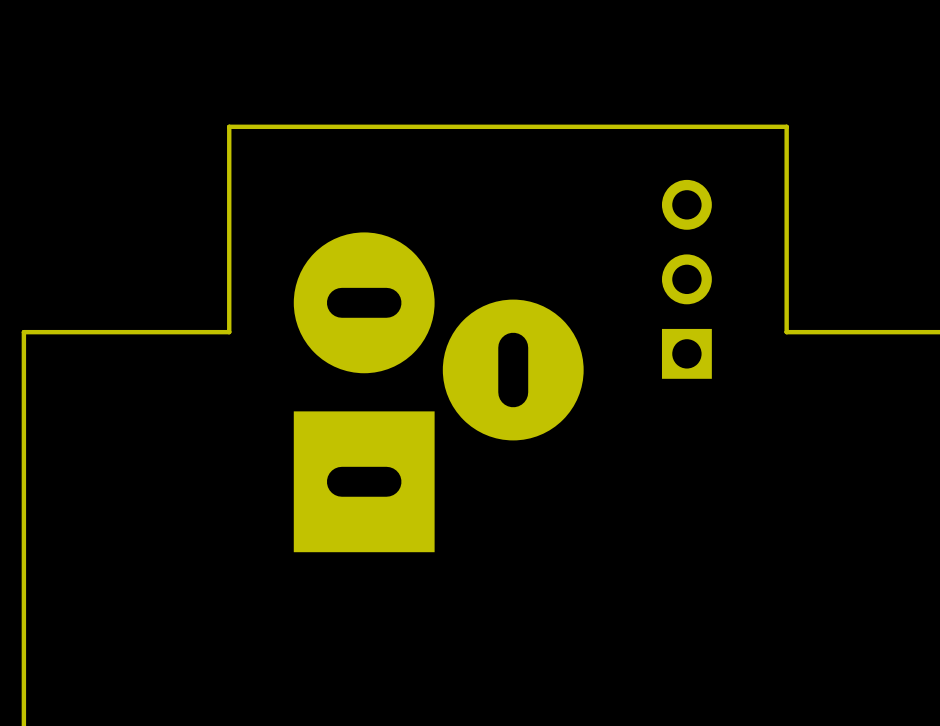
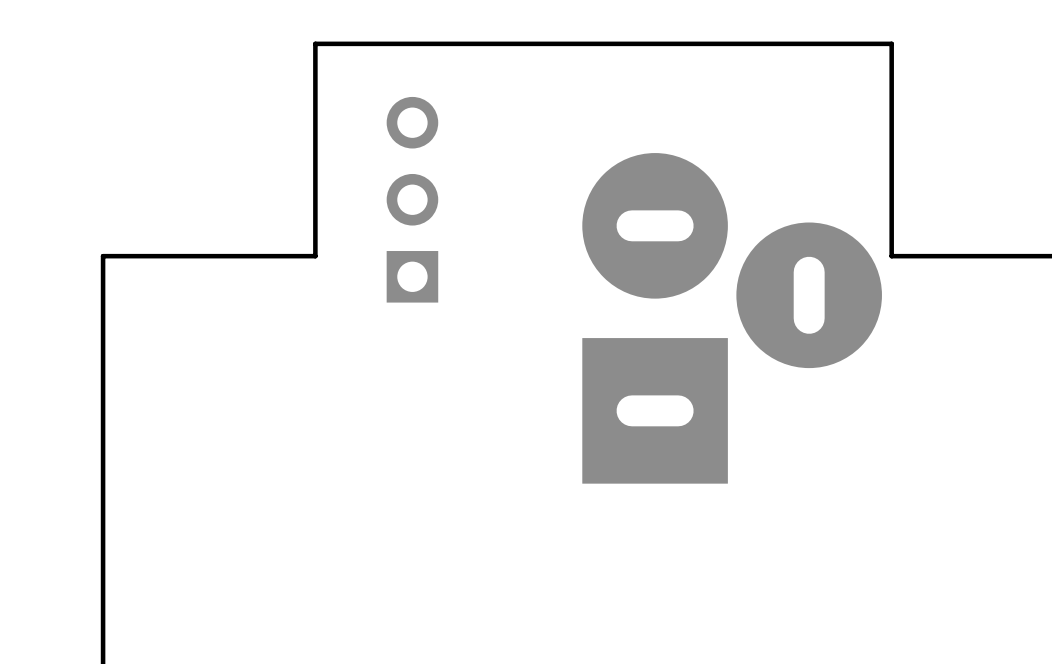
part position: (686, 279) -> (412, 199)
part position: (438, 392) -> (732, 318)

